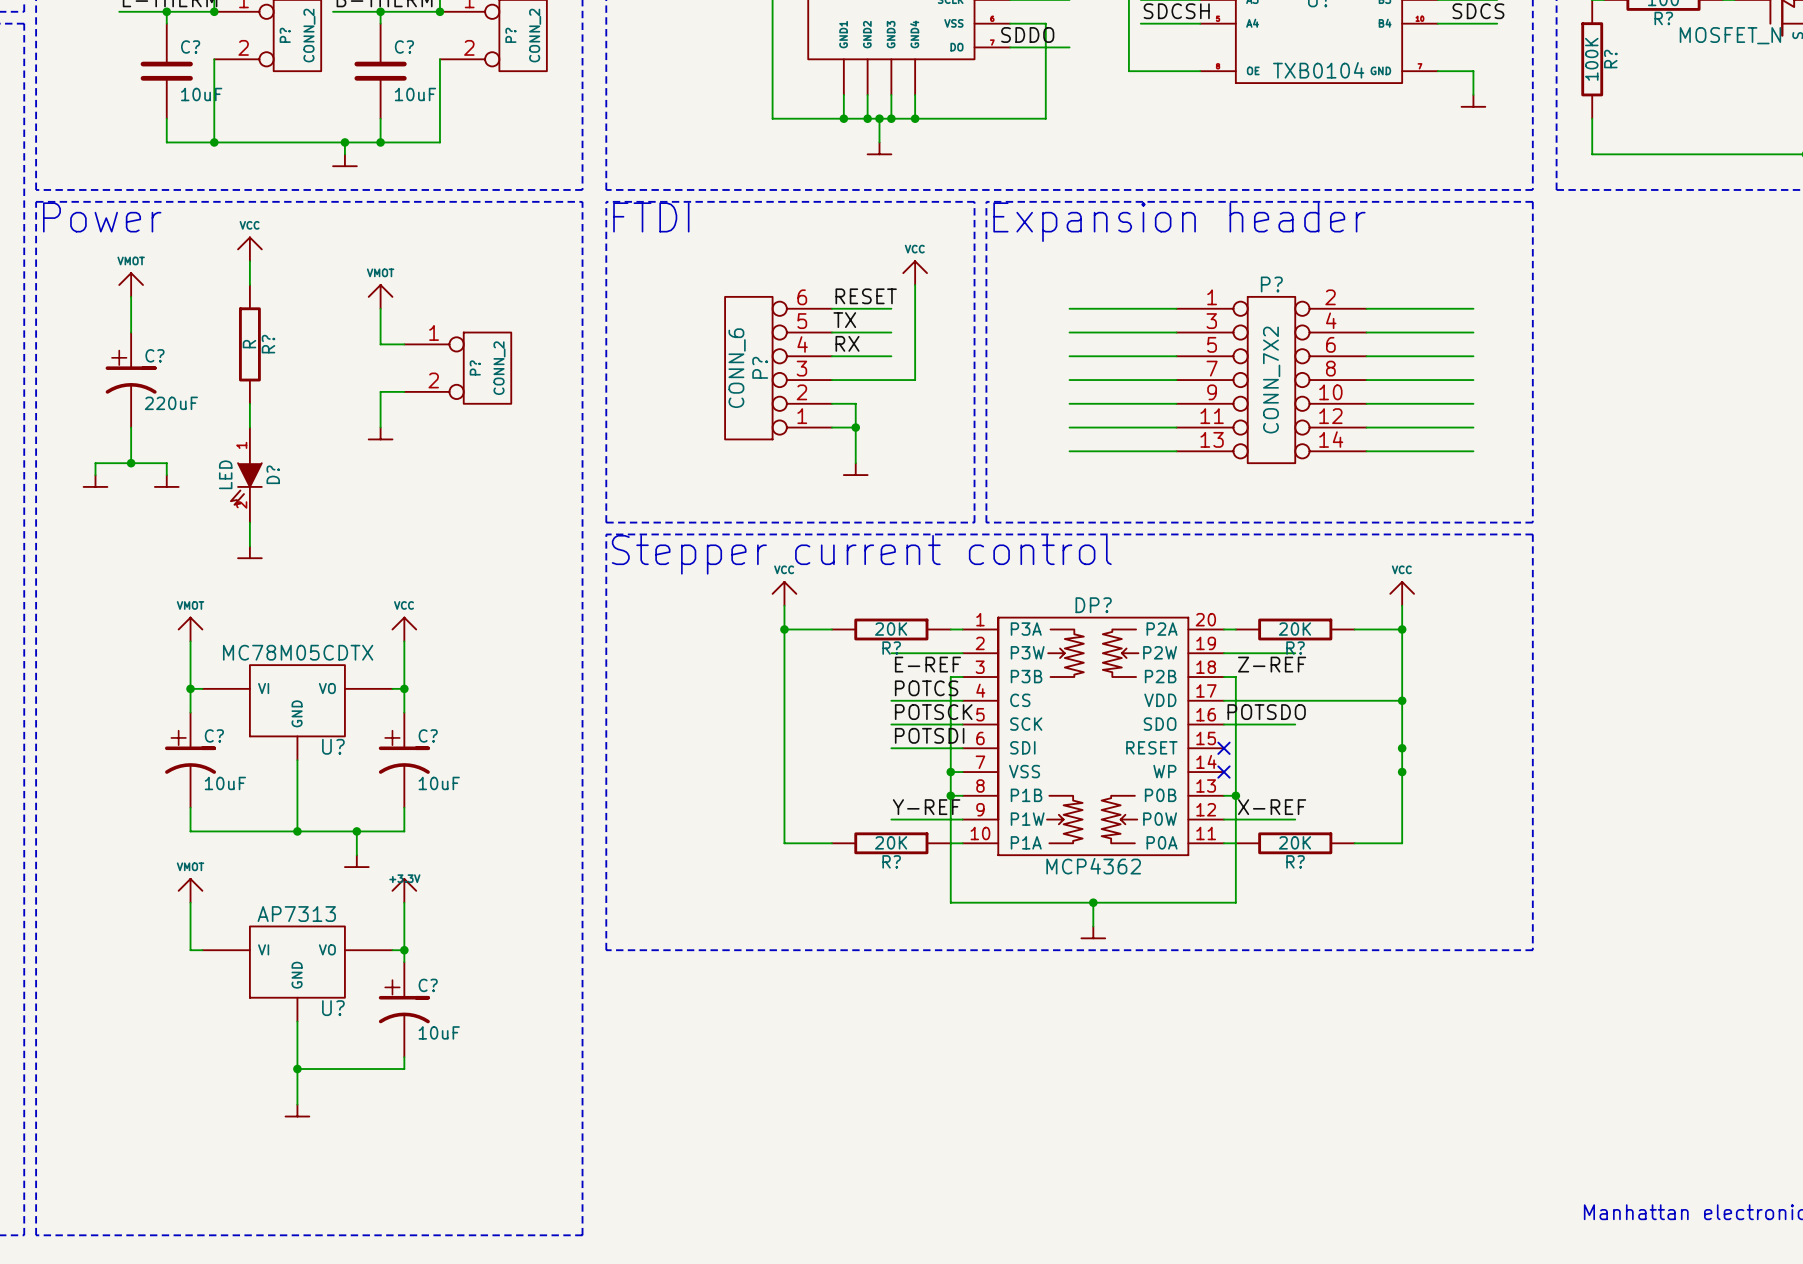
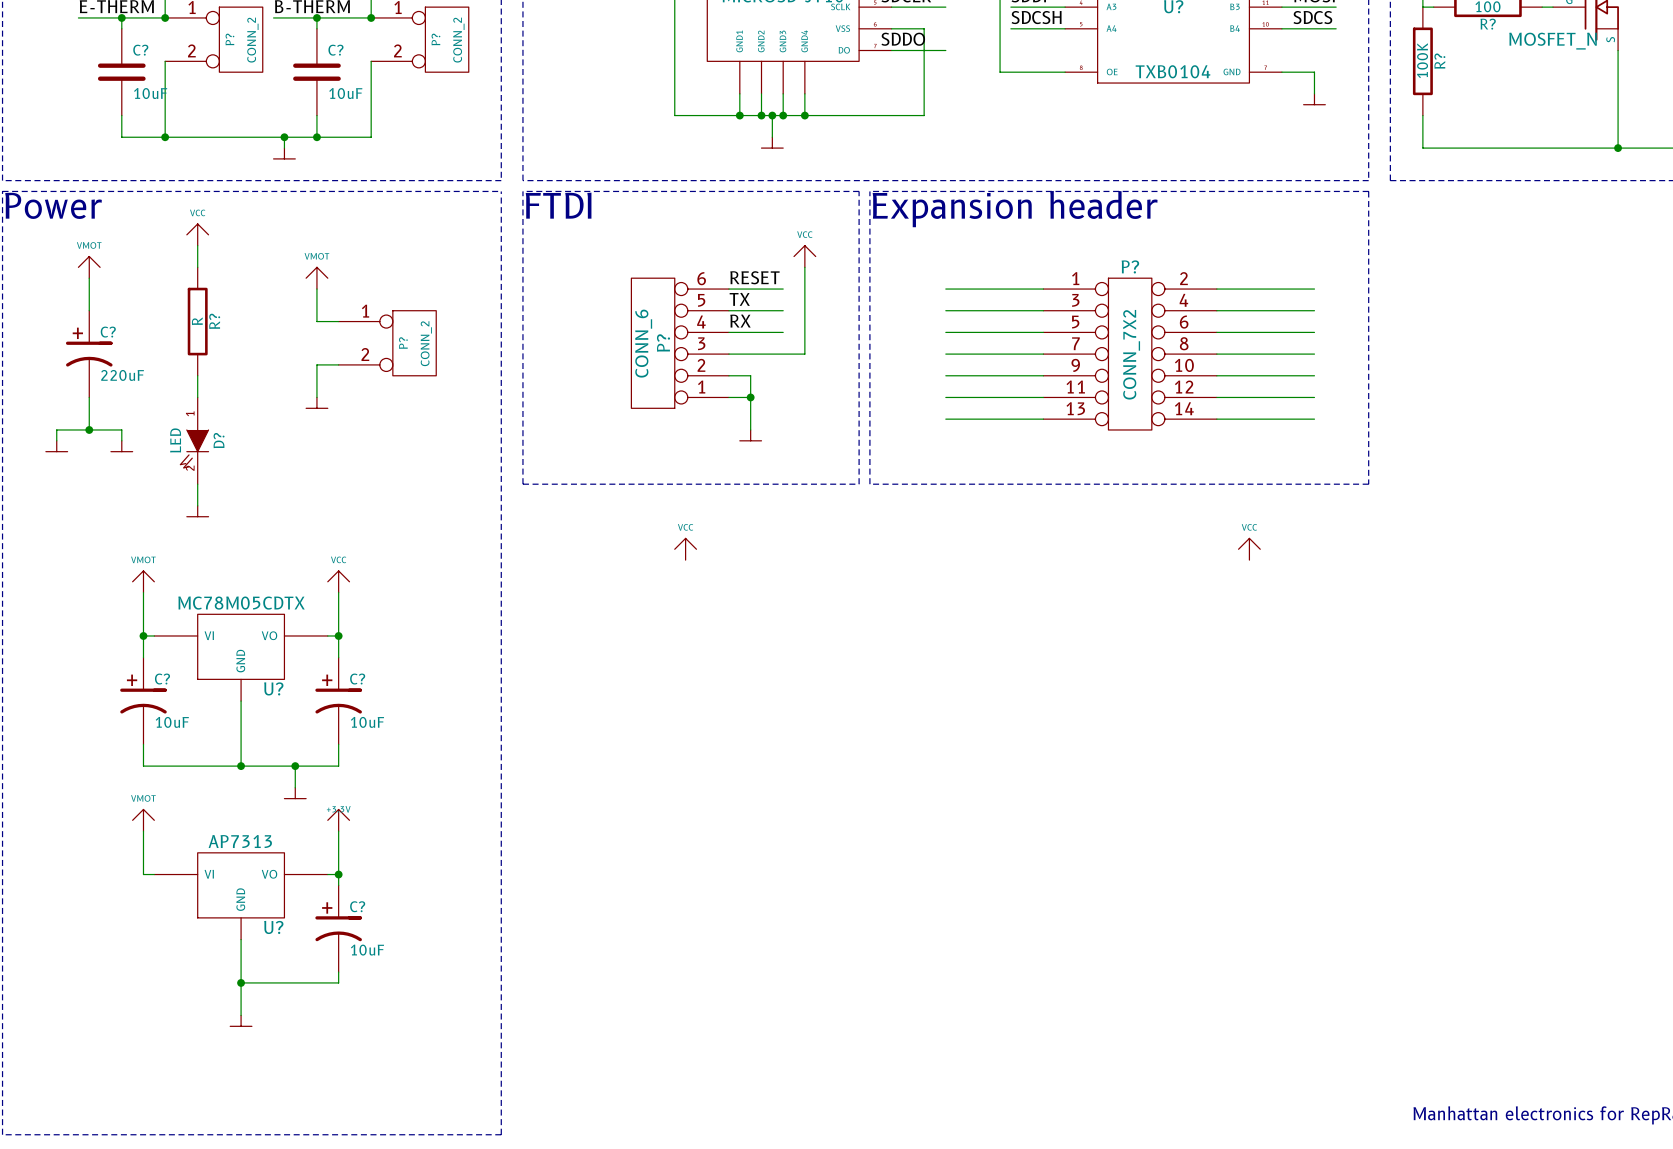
line: (606, 534) (1532, 534) (1532, 950) (606, 950) (606, 534) -> none
text: Stepper current control (861, 554) -> none
wire: (784, 605) (784, 843) (831, 843) -> none
wire: (1402, 605) (1402, 843) (1354, 843) -> none
wire: (784, 629) (831, 629) -> none
junction: (784, 629) -> none
R?: 20K (891, 629) -> none
wire: (950, 629) (962, 629) -> none
wire: (1223, 629) (1235, 629) -> none
R?: 20K (1295, 629) -> none
wire: (1354, 629) (1402, 629) -> none
junction: (1402, 629) -> none
wire: (891, 653) (962, 653) -> none
wire: (1223, 653) (1295, 653) -> none
label: E-REF (927, 664) -> none
label: Z-REF (1272, 664) -> none
wire: (962, 677) (950, 677) (950, 902) (1235, 902) (1235, 677) (1223, 677) -> none
label: POTCS (926, 688) -> none
wire: (891, 700) (962, 700) -> none
wire: (1223, 700) (1402, 700) -> none
junction: (1402, 700) -> none
label: POTSCK (933, 712) -> none
label: POTSDO (1266, 712) -> none
wire: (891, 724) (962, 724) -> none
wire: (1223, 724) (1295, 724) -> none
label: POTSDI (929, 735) -> none
DP?: MCP4362 (1093, 736) -> none
wire: (891, 748) (962, 748) -> none
no-connect mark: (1223, 748) -> none
junction: (1402, 748) -> none
wire: (950, 772) (962, 772) -> none
junction: (950, 772) -> none
no-connect mark: (1223, 772) -> none
junction: (1402, 772) -> none
wire: (950, 795) (962, 795) -> none
junction: (950, 795) -> none
wire: (1223, 795) (1235, 795) -> none
junction: (1235, 795) -> none
label: Y-REF (926, 807) -> none
label: X-REF (1272, 807) -> none
wire: (891, 819) (962, 819) -> none
wire: (1223, 819) (1295, 819) -> none
R?: 20K (891, 843) -> none
wire: (950, 843) (962, 843) -> none
wire: (1223, 843) (1235, 843) -> none
R?: 20K (1295, 843) -> none
wire: (1093, 902) (1093, 926) -> none
junction: (1093, 902) -> none
power symbol: (1093, 932) -> none

